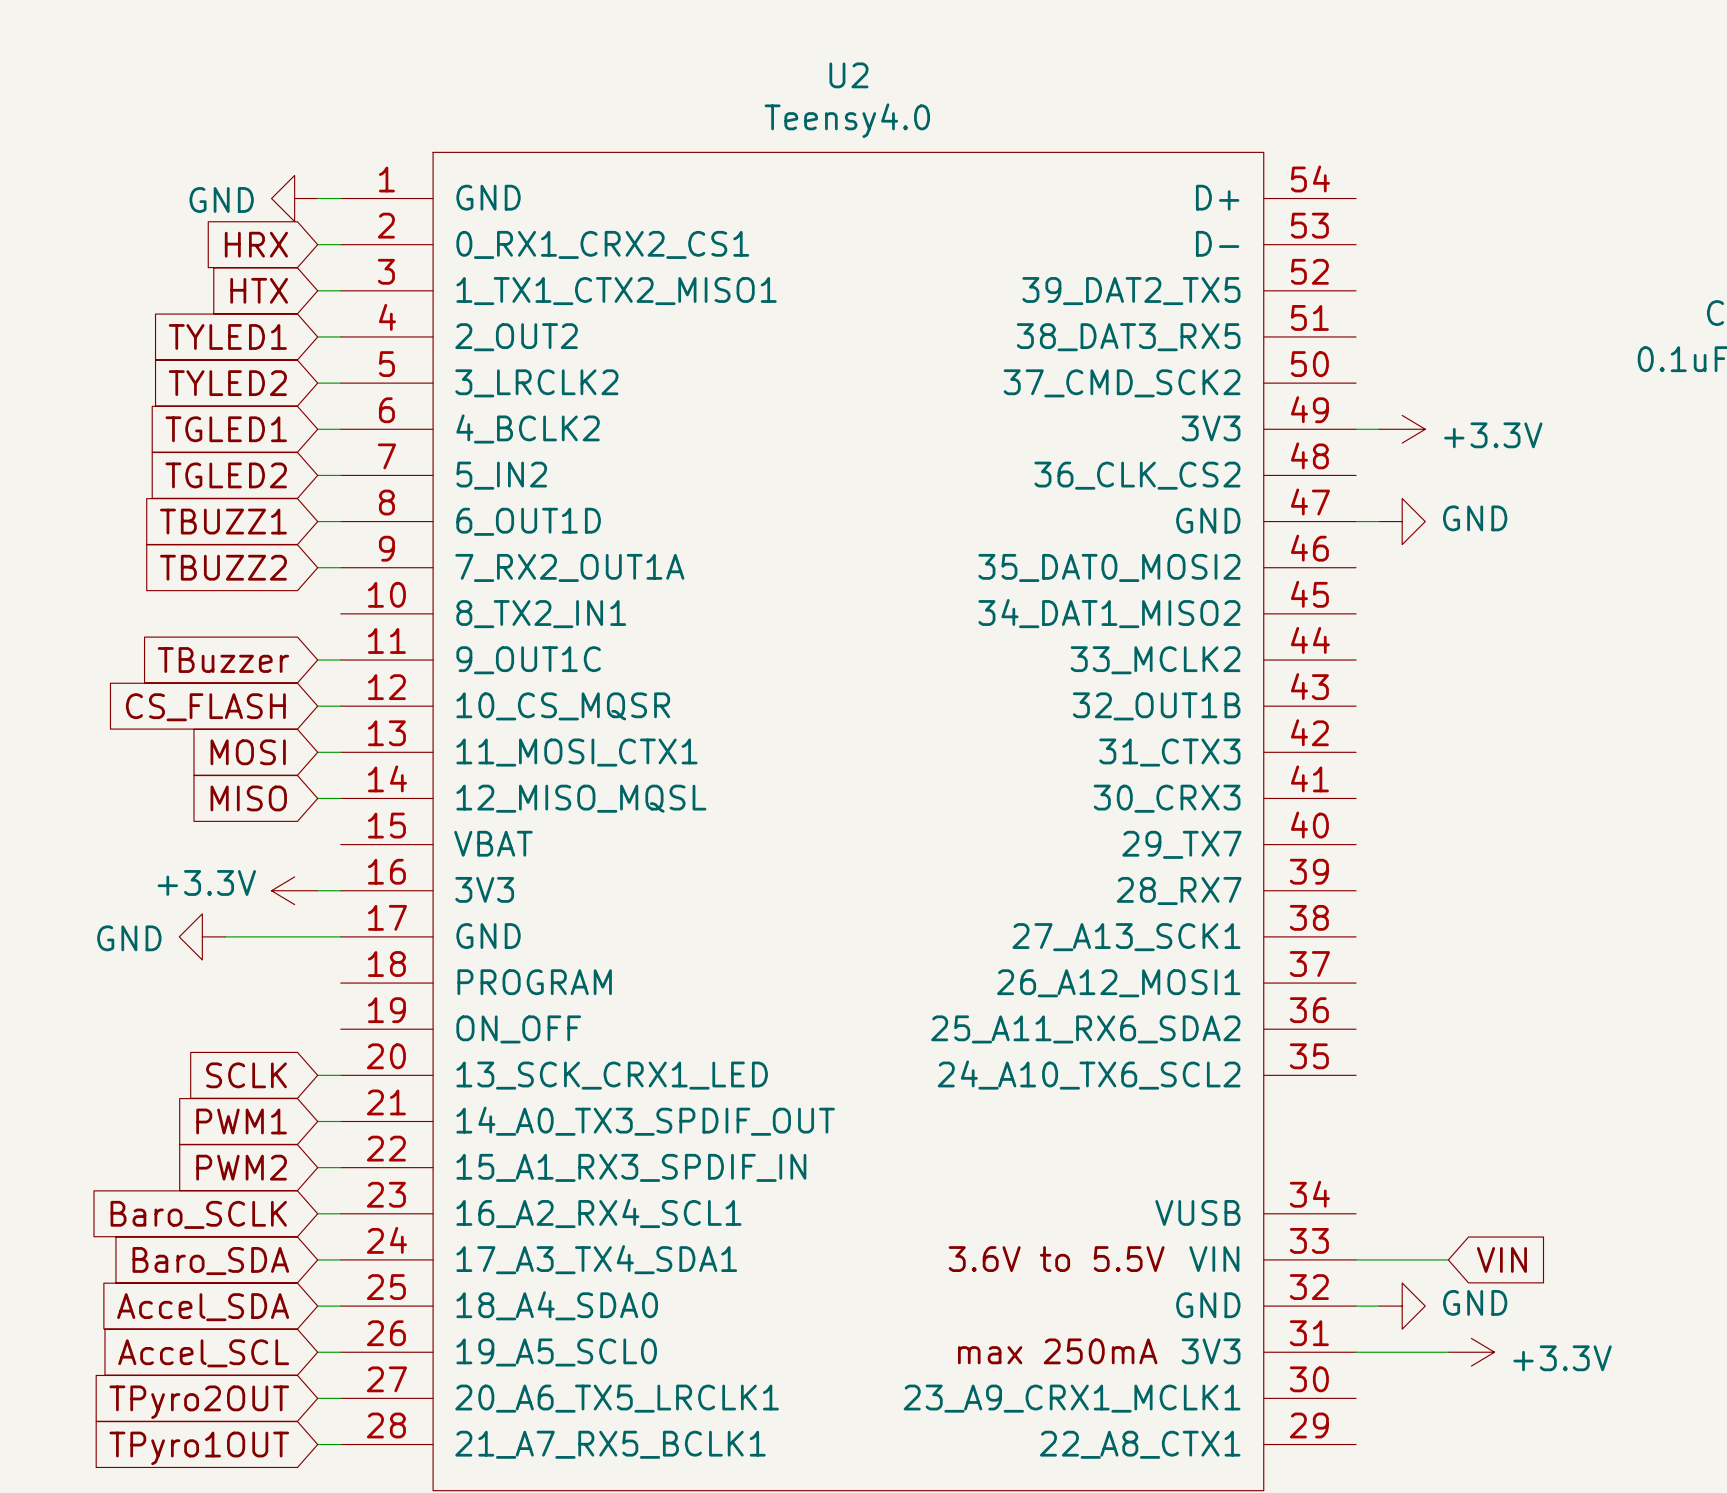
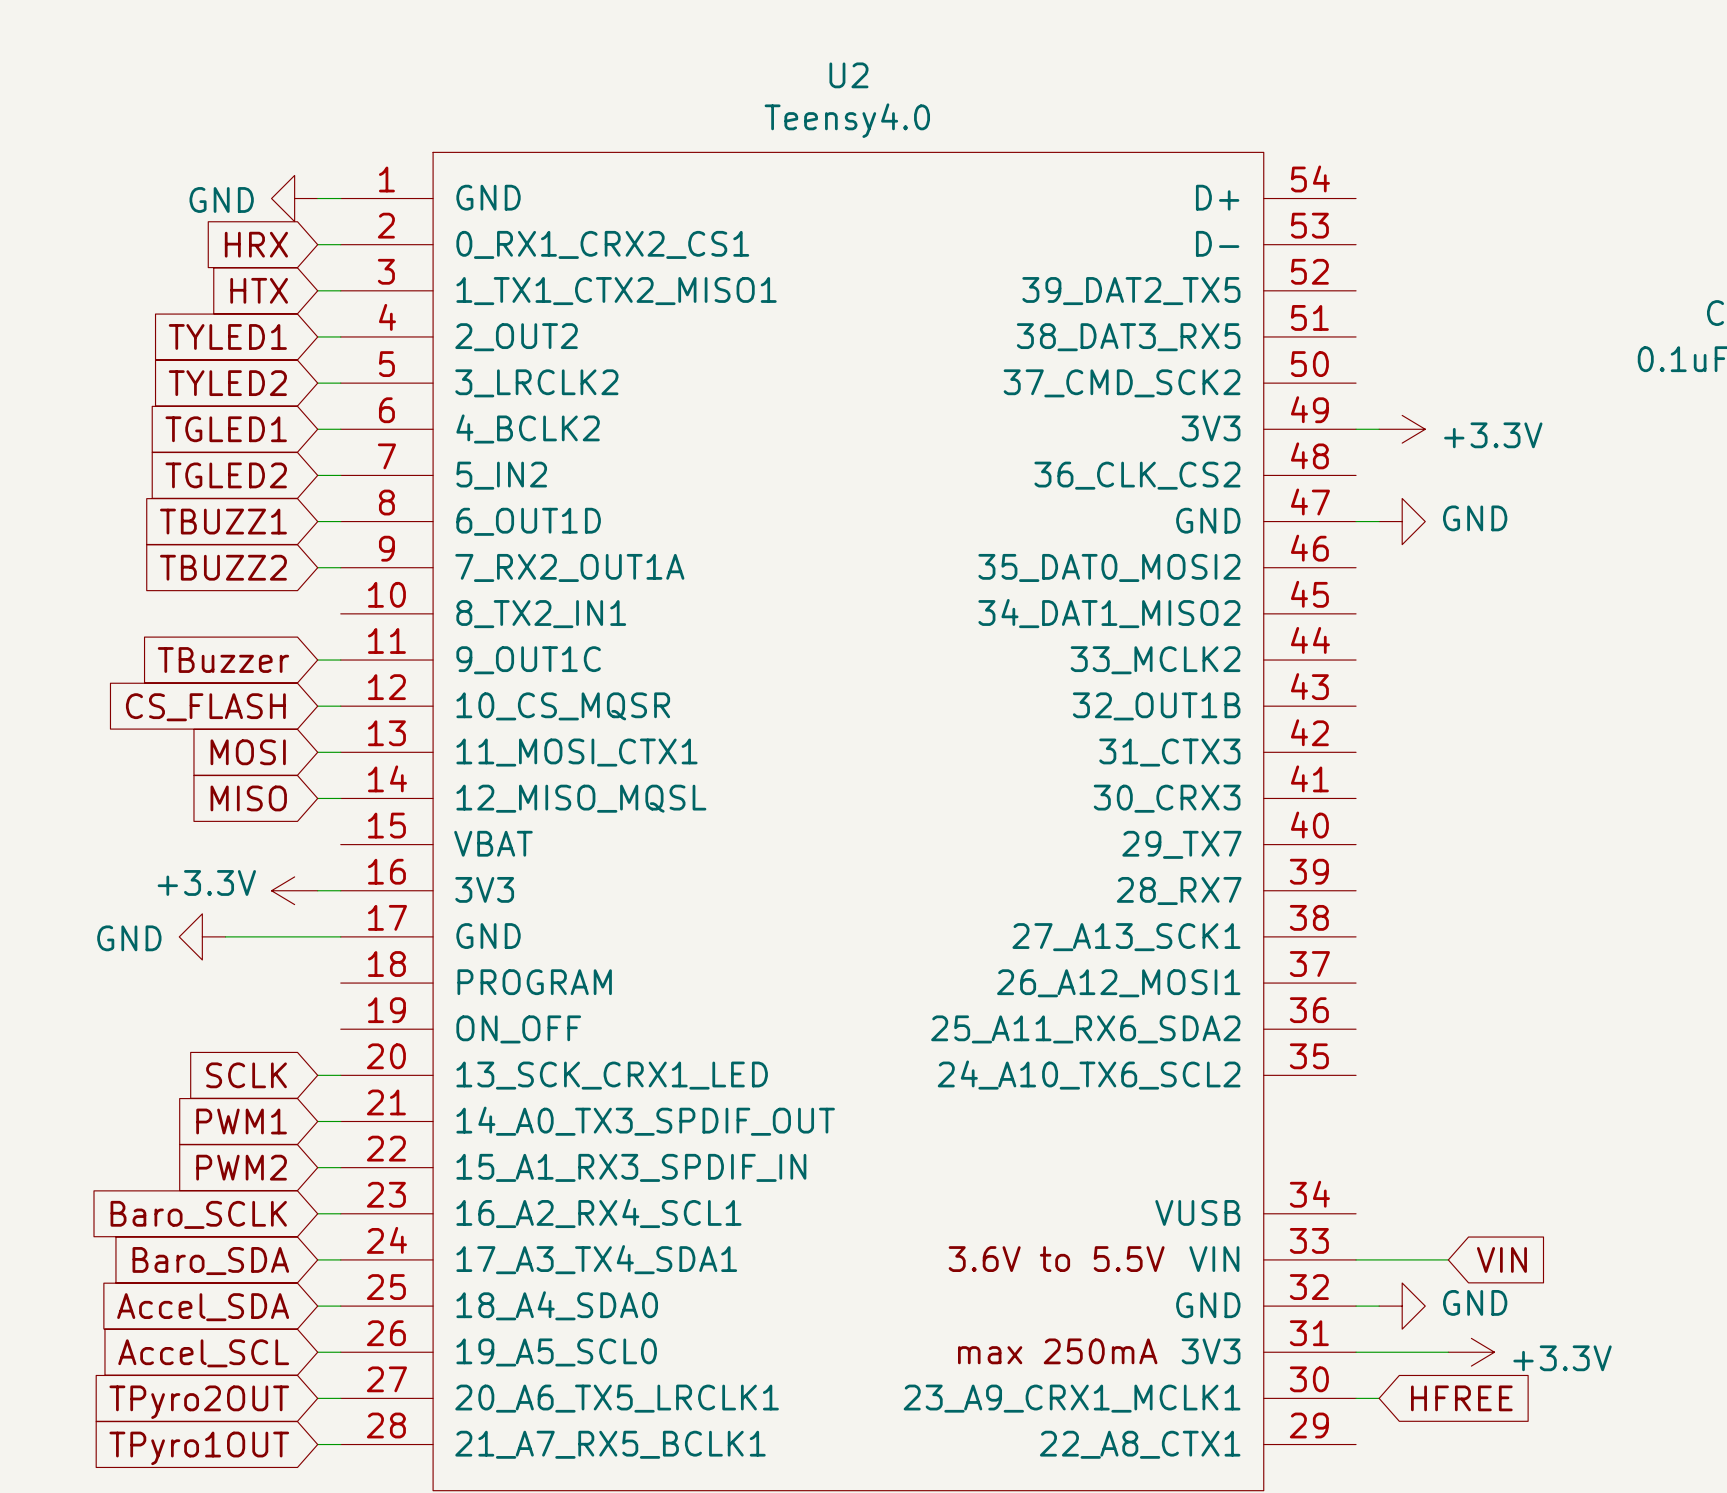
wire: none -> (1356, 1398) (1379, 1398)
global label: none -> HFREE (1461, 1398)

